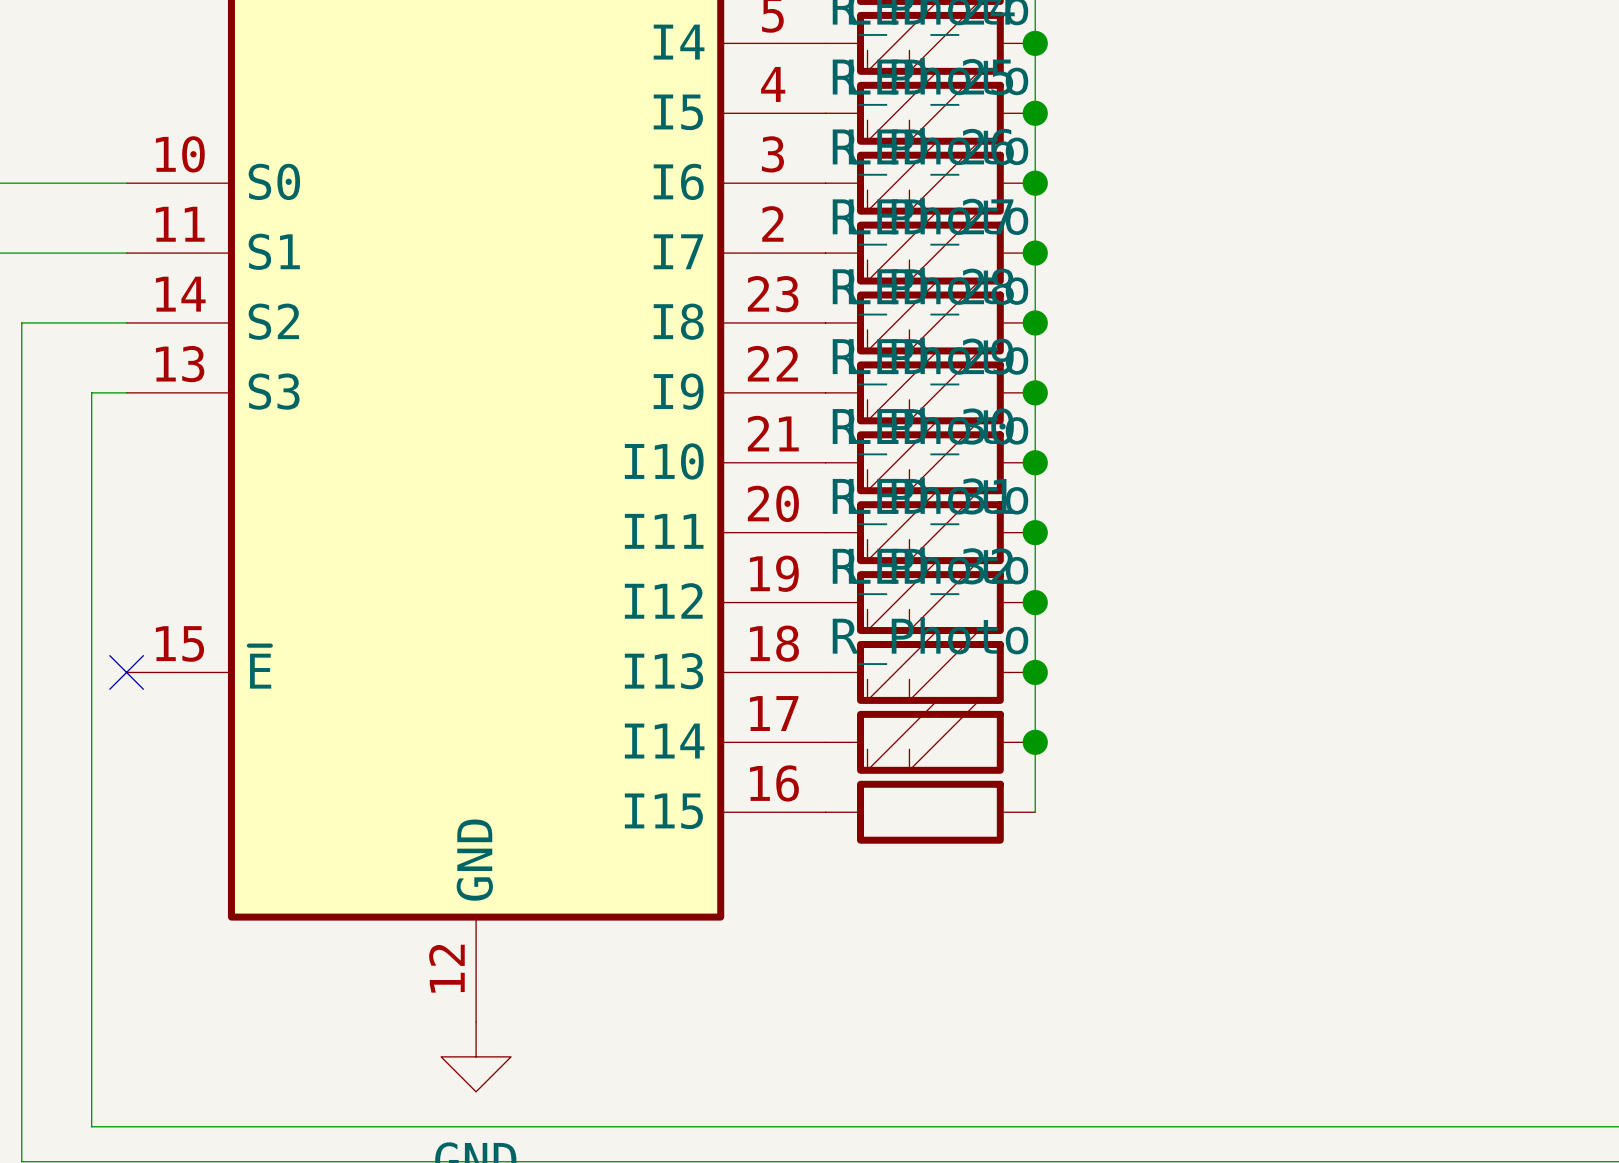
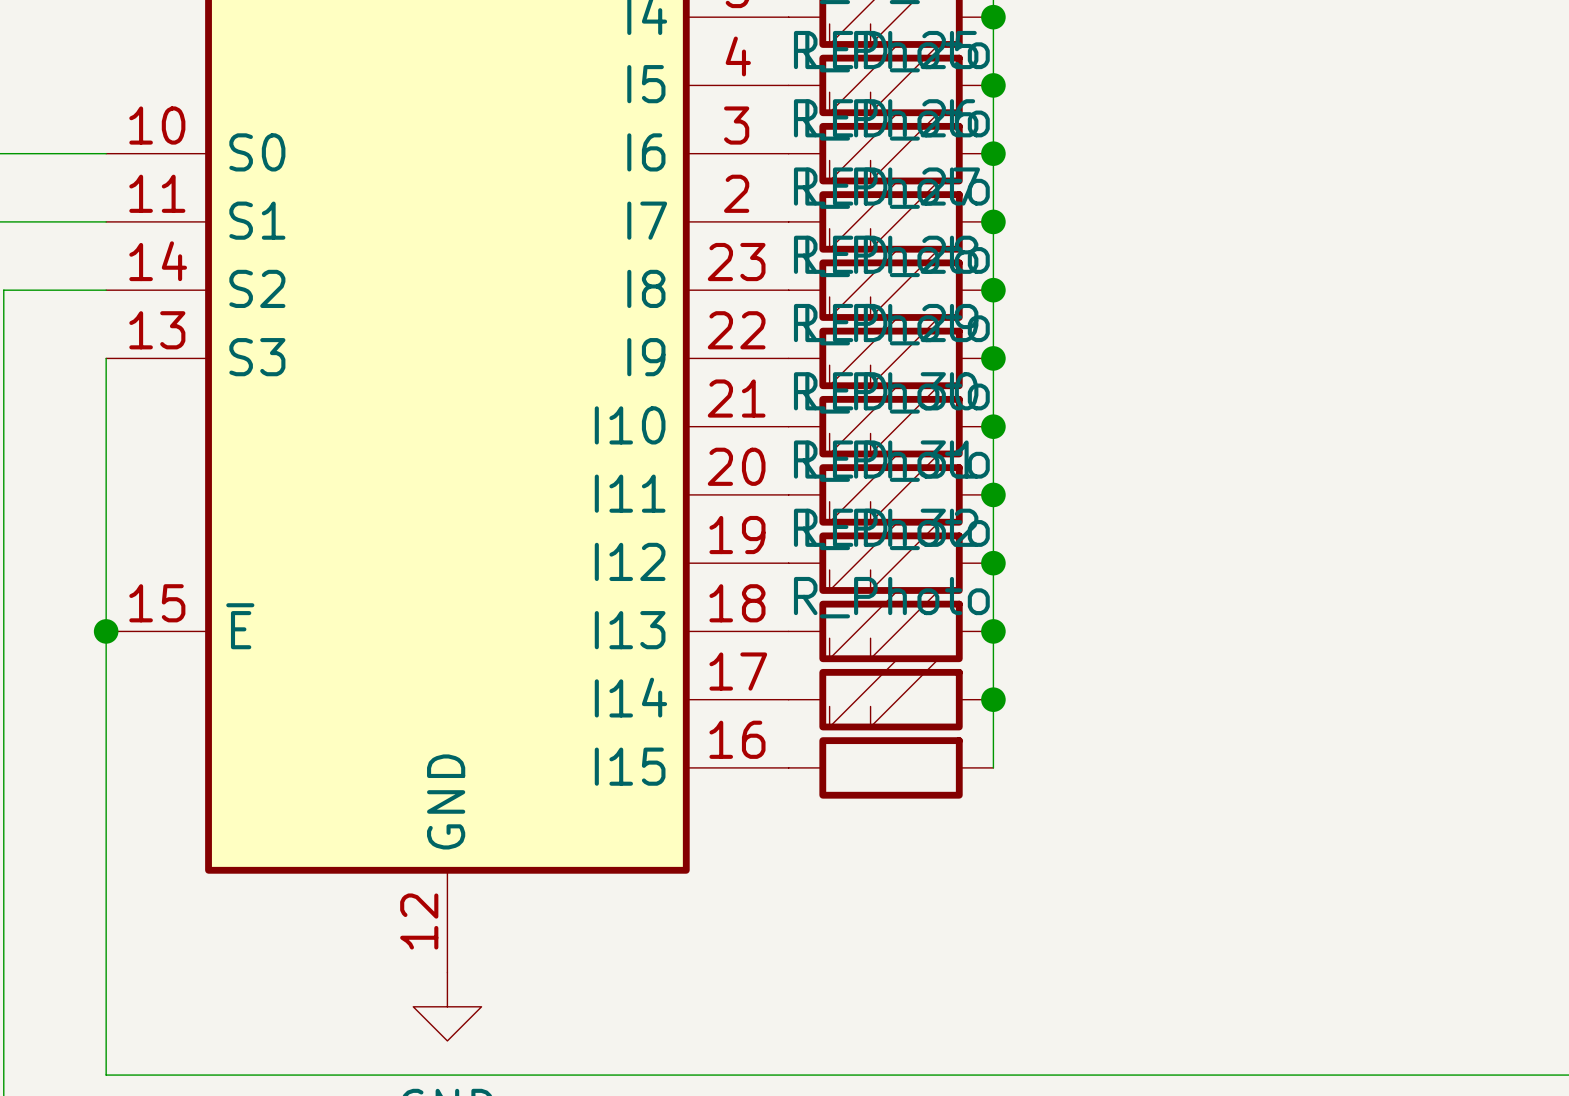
wire: (126, 392) (91, 392) (91, 1126) (126, 1126) -> (106, 358) (106, 1075)
no-connect mark: (126, 672) -> none
junction: none -> (106, 631)

